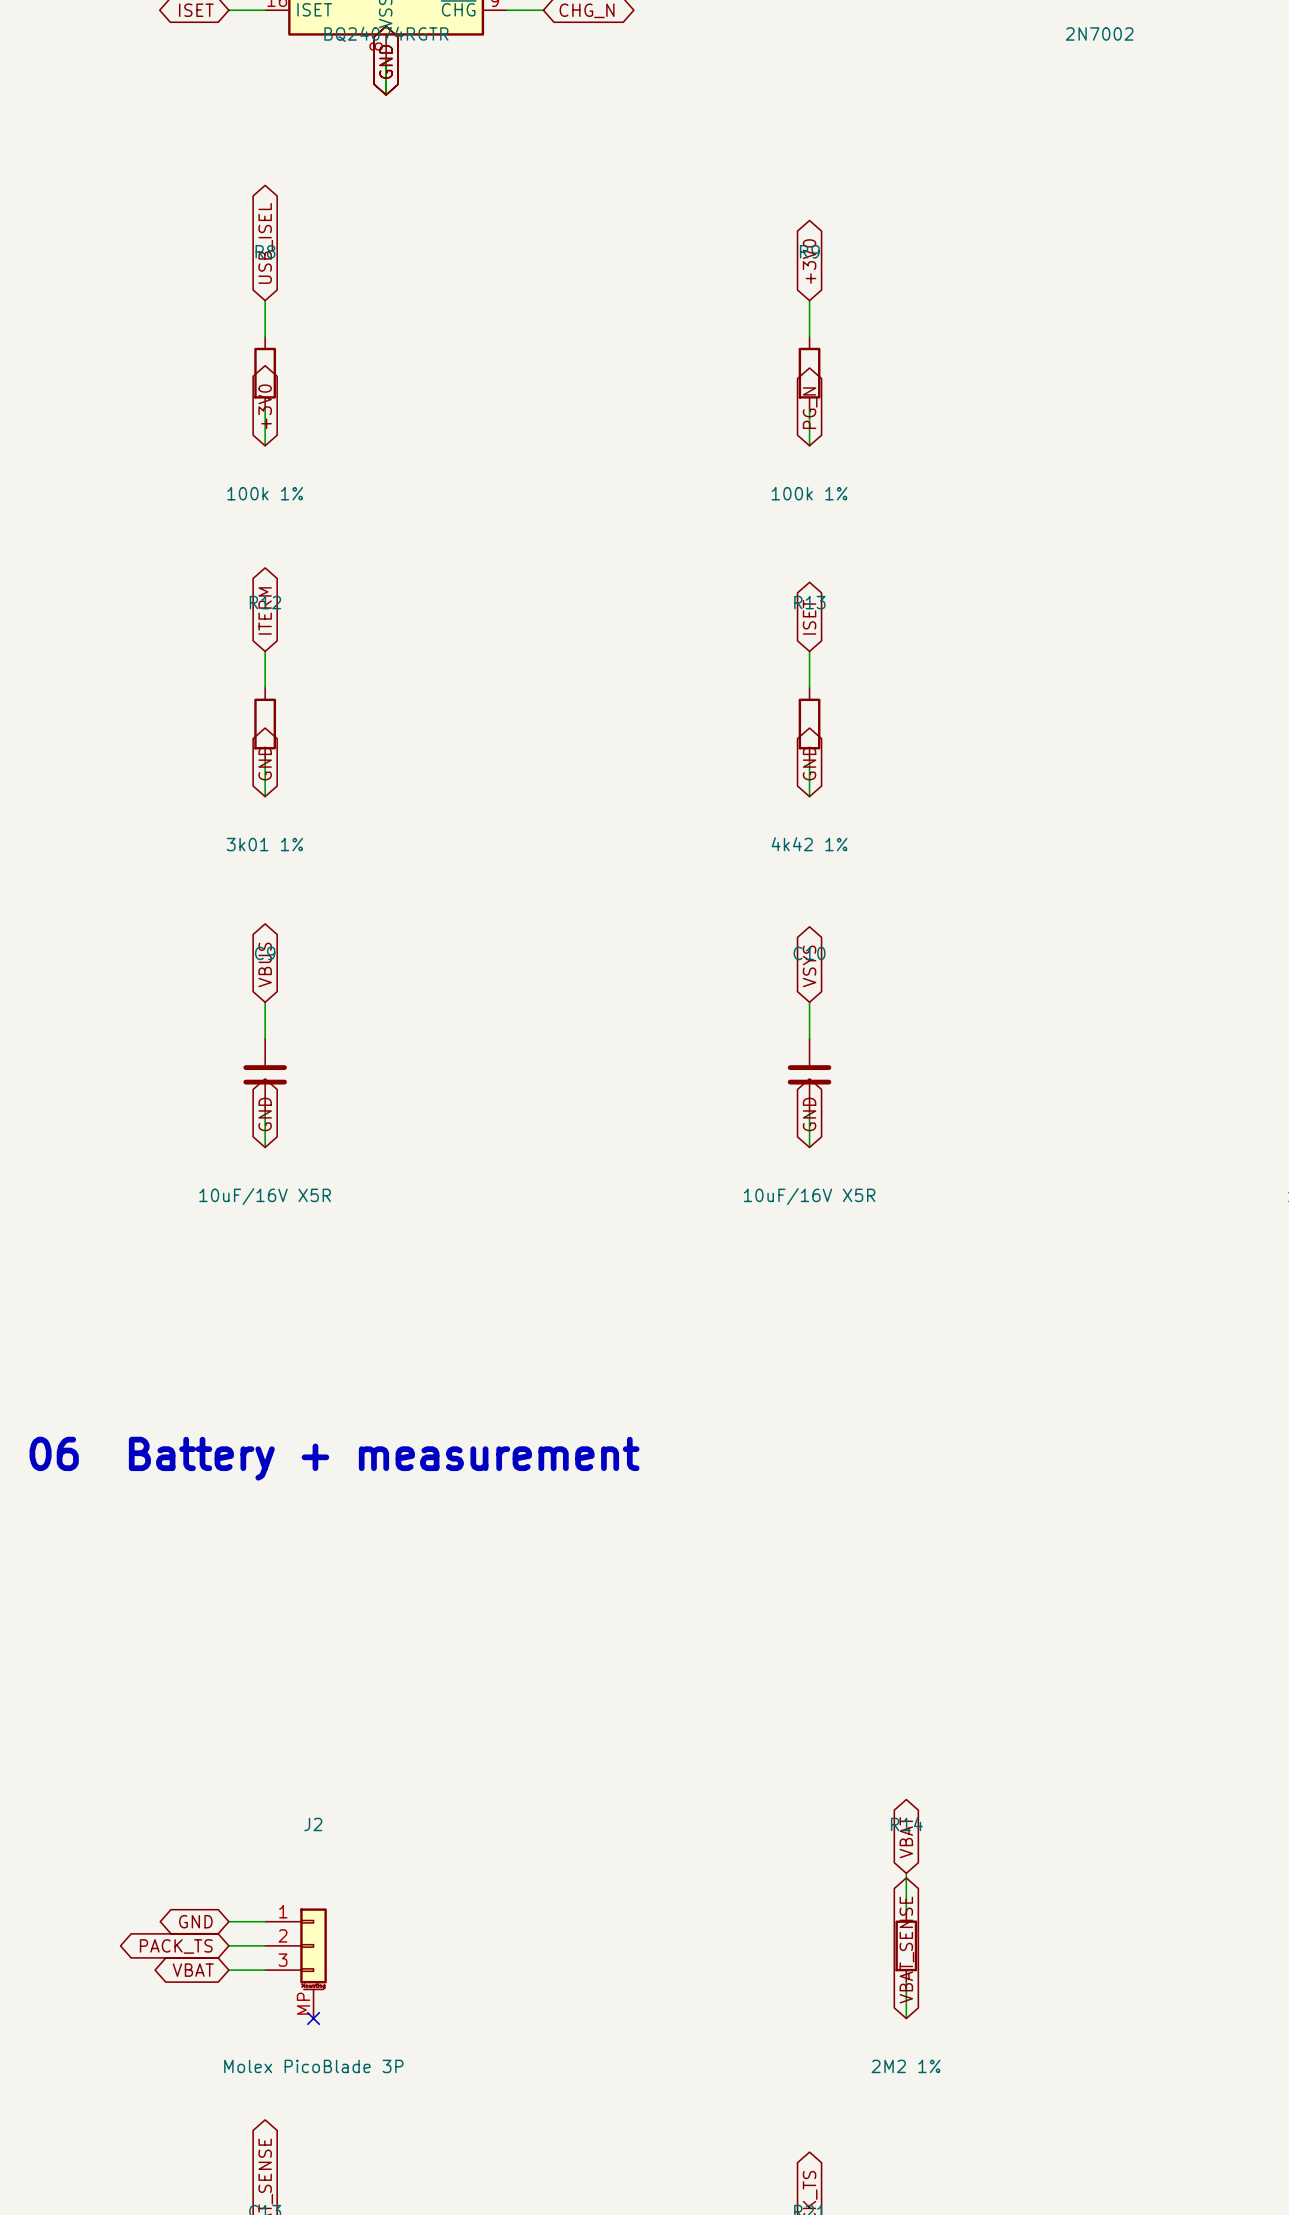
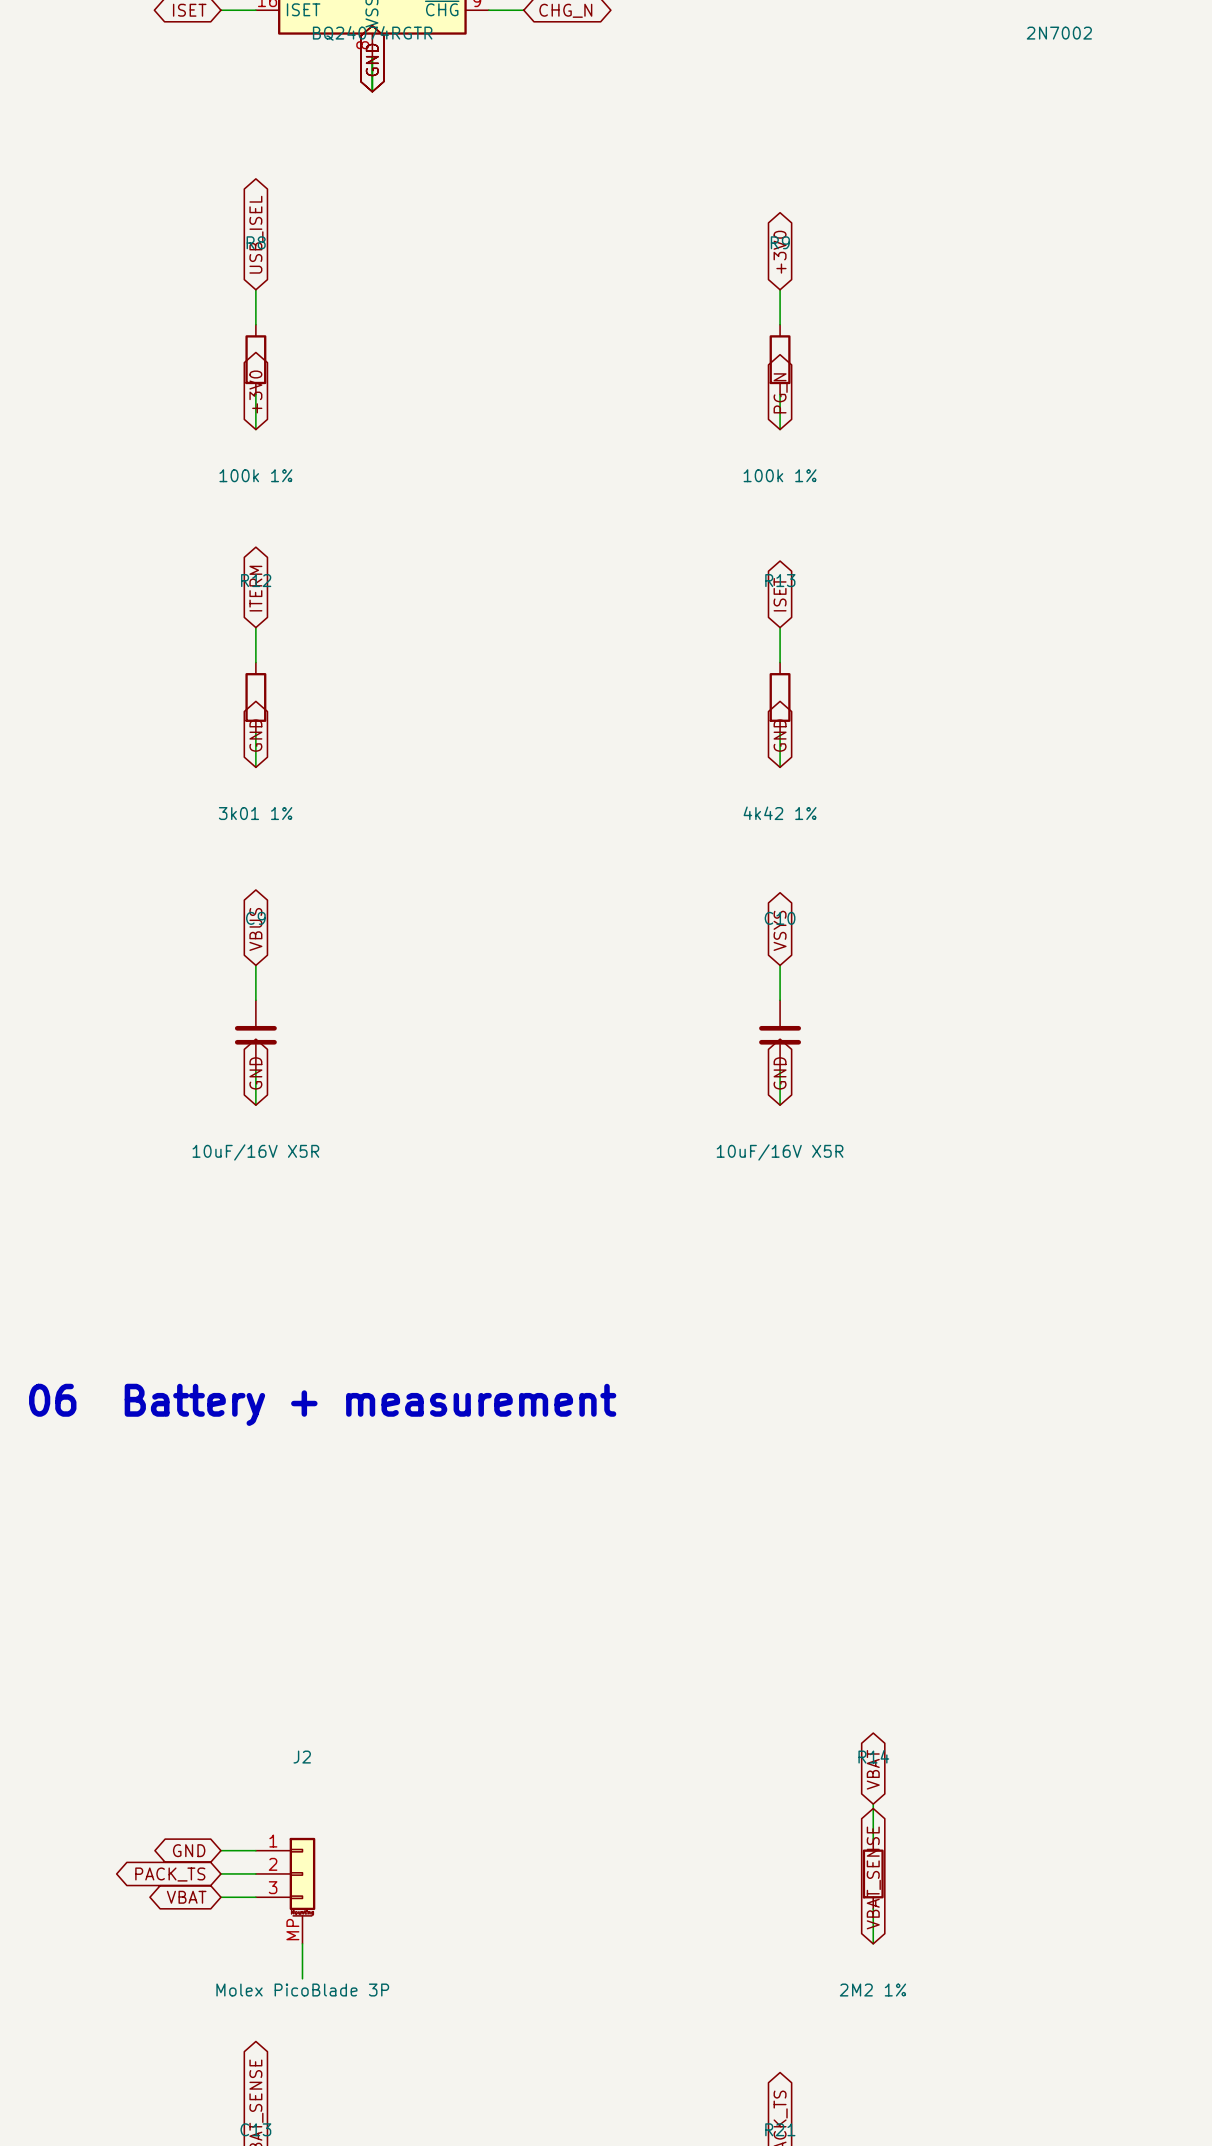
wire: none -> (302, 1943) (302, 1978)
no-connect mark: (313, 2018) -> none

